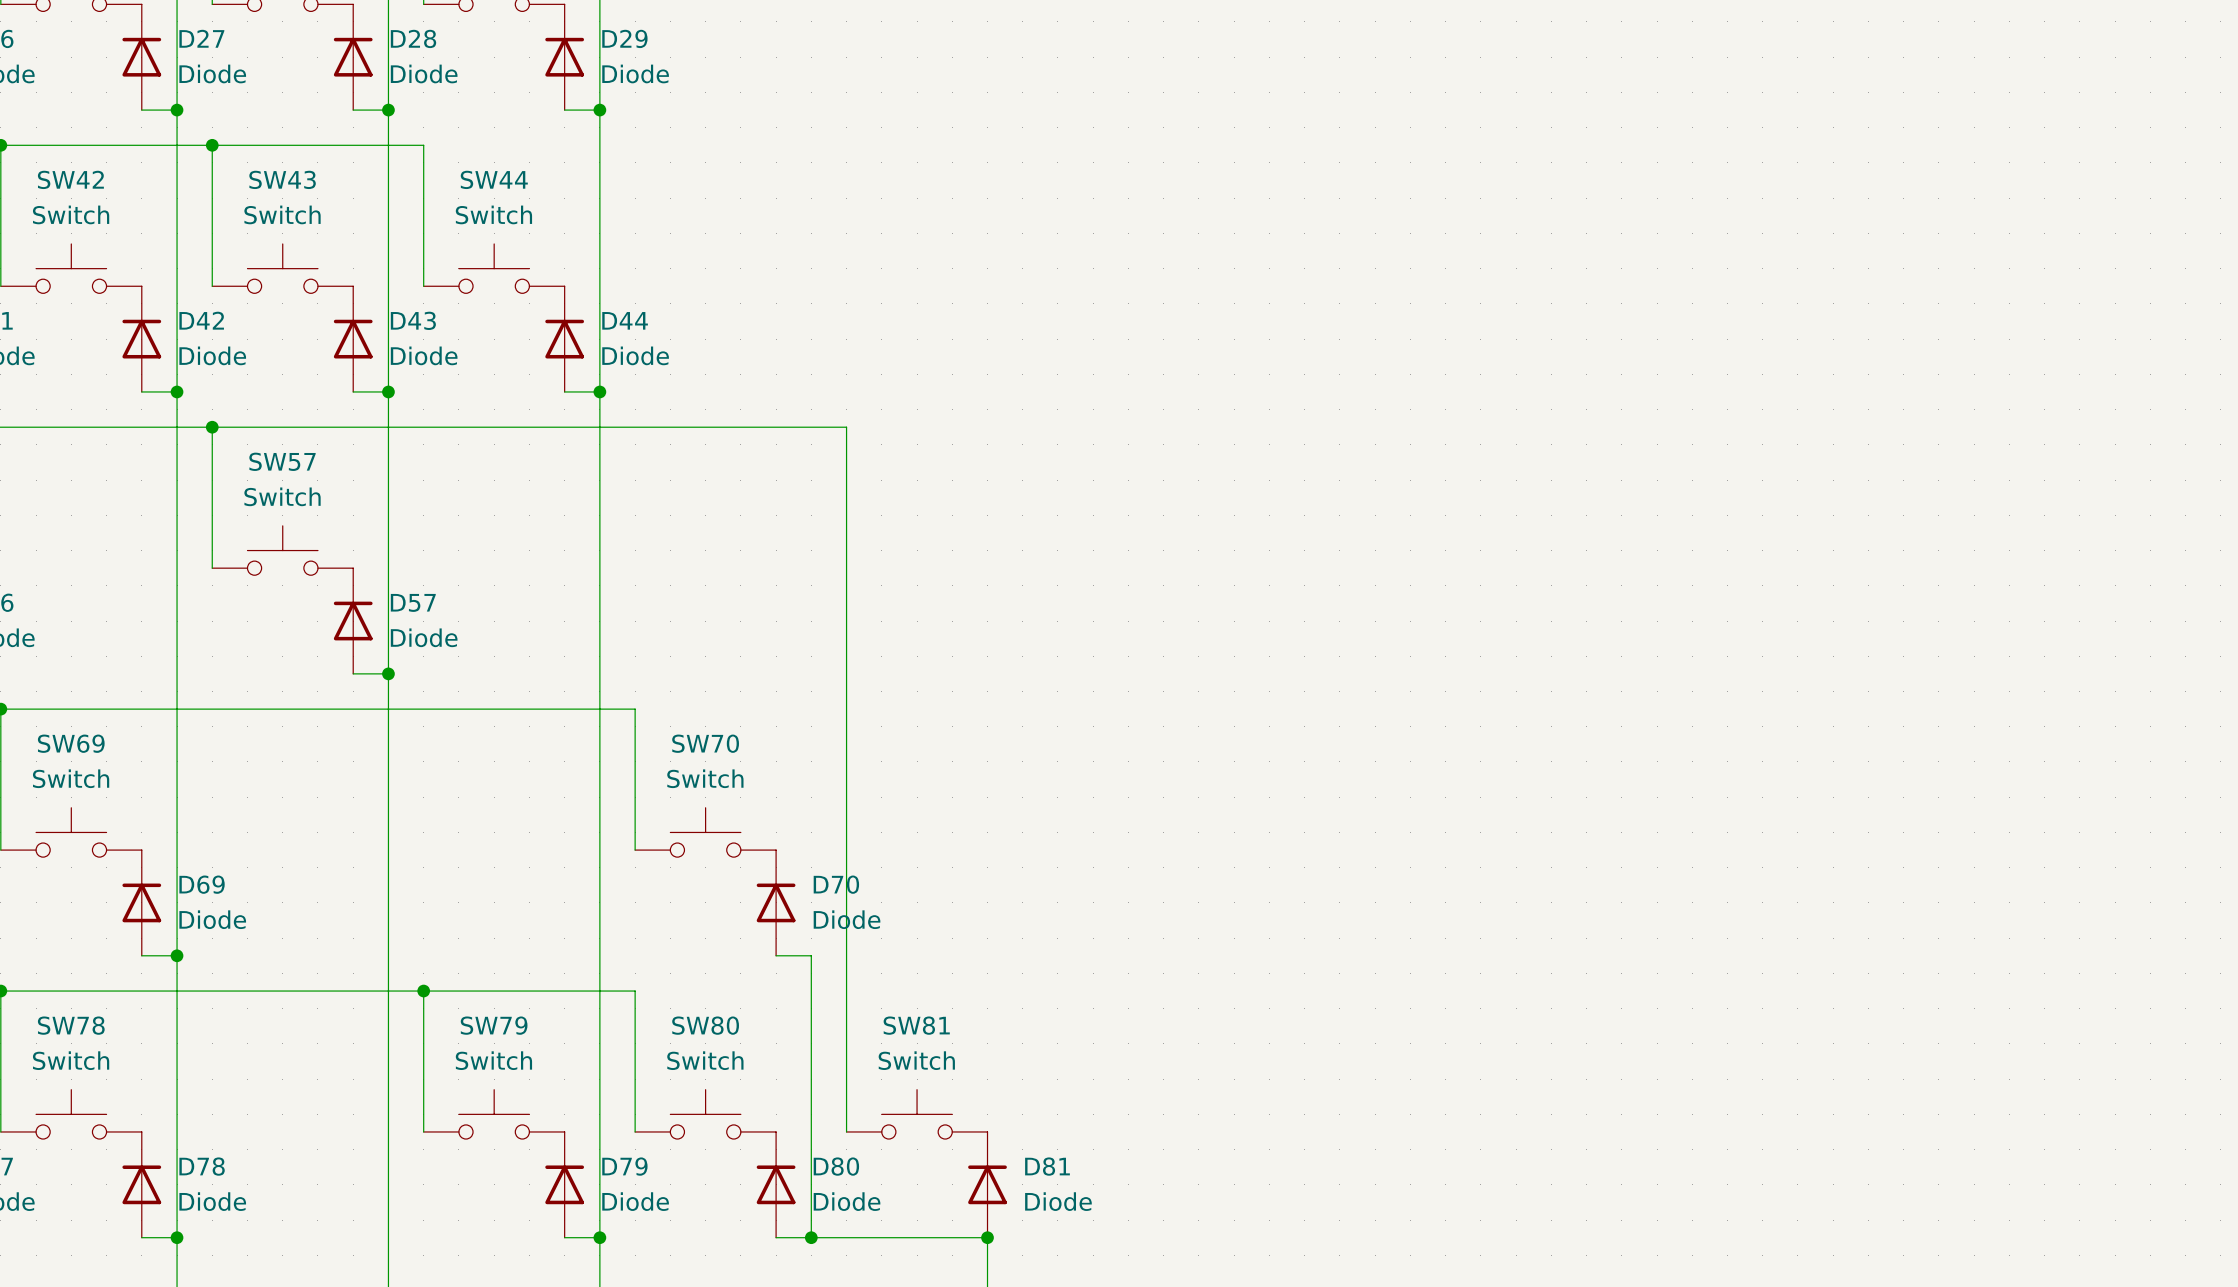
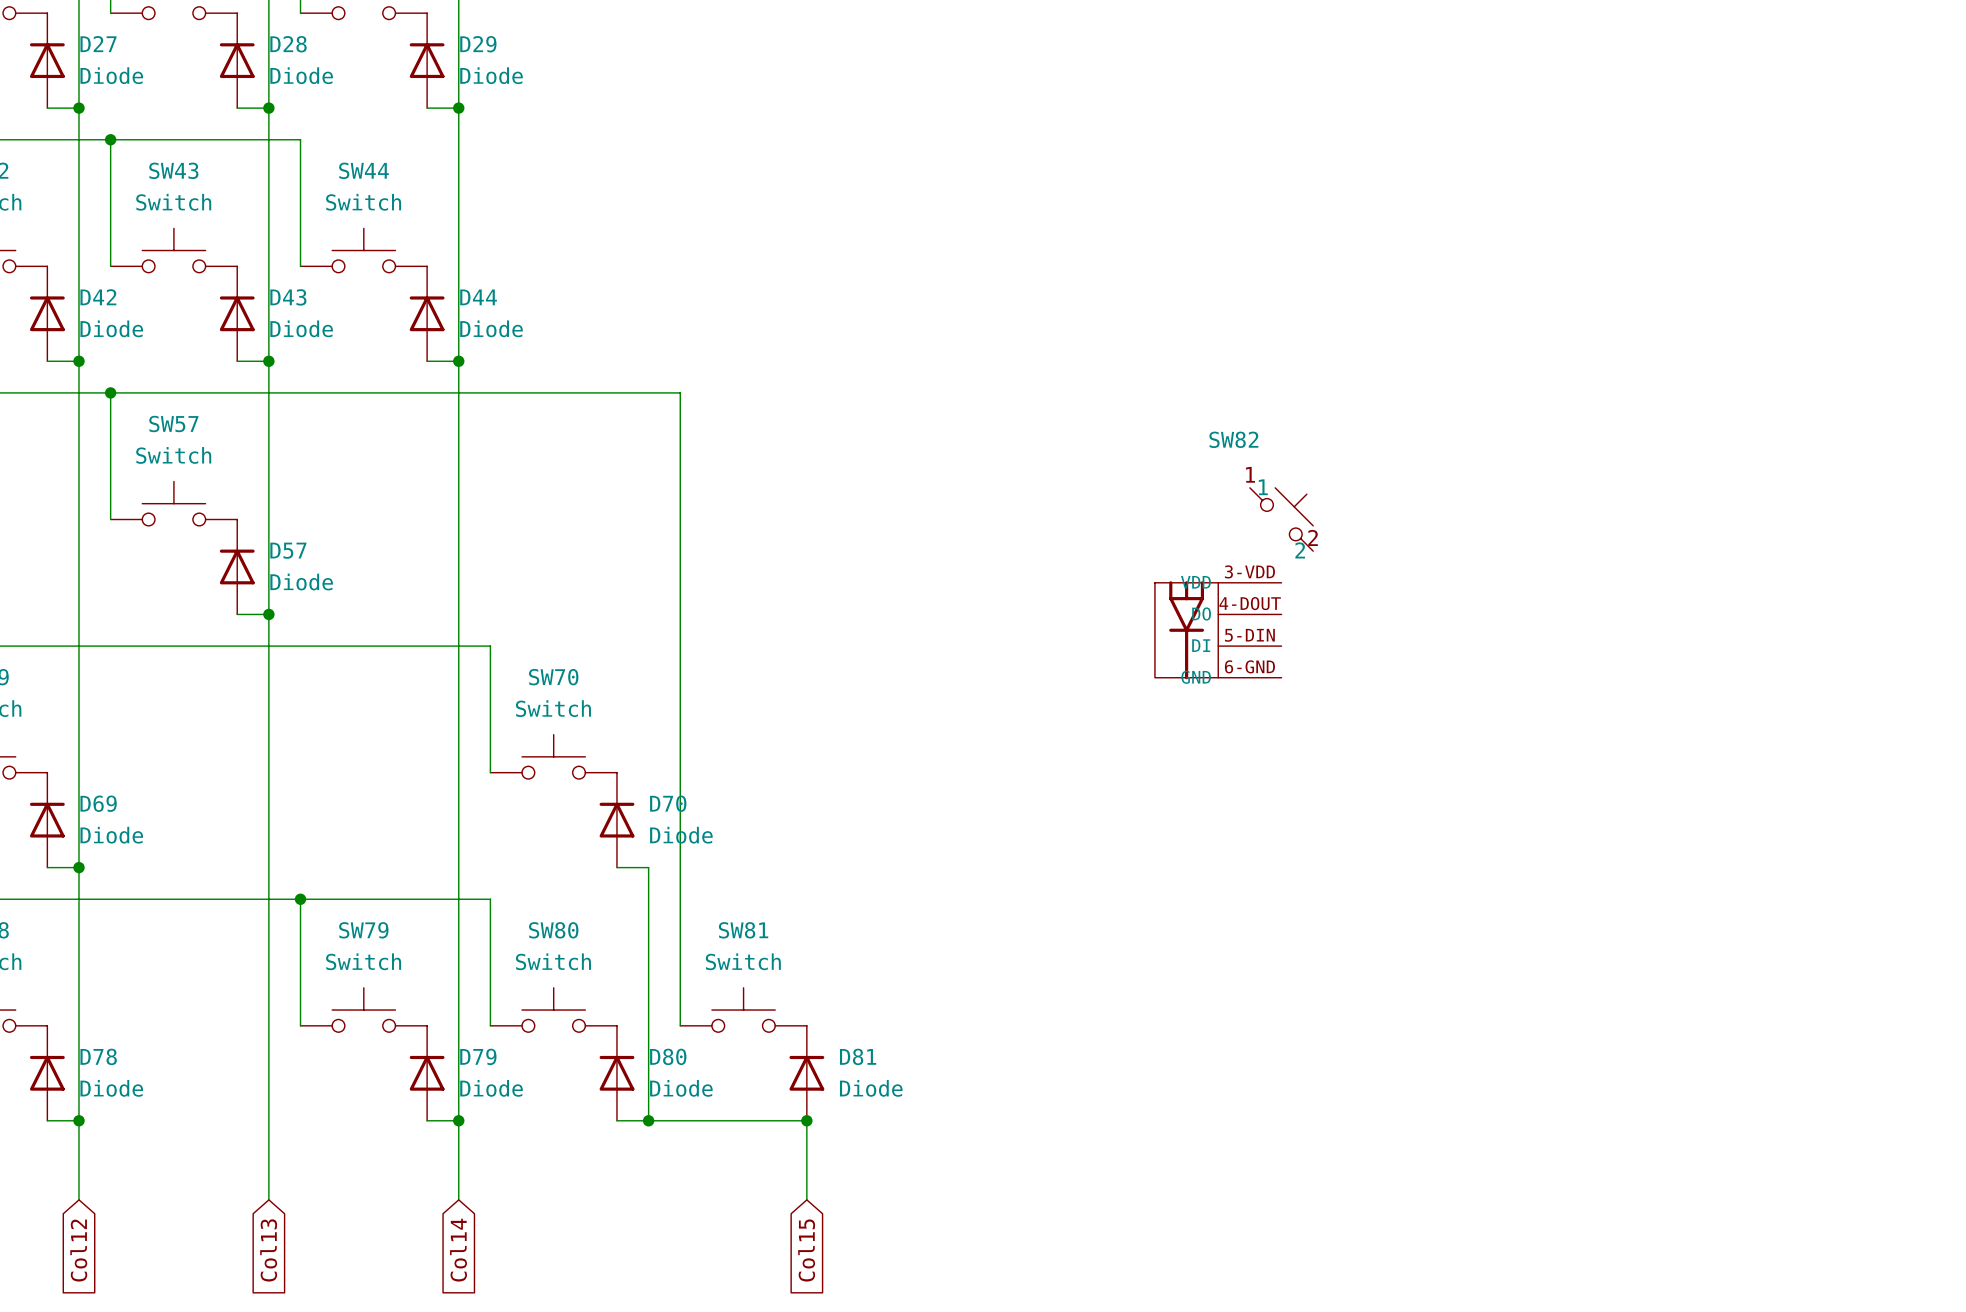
SW82: none -> (1234, 583)

